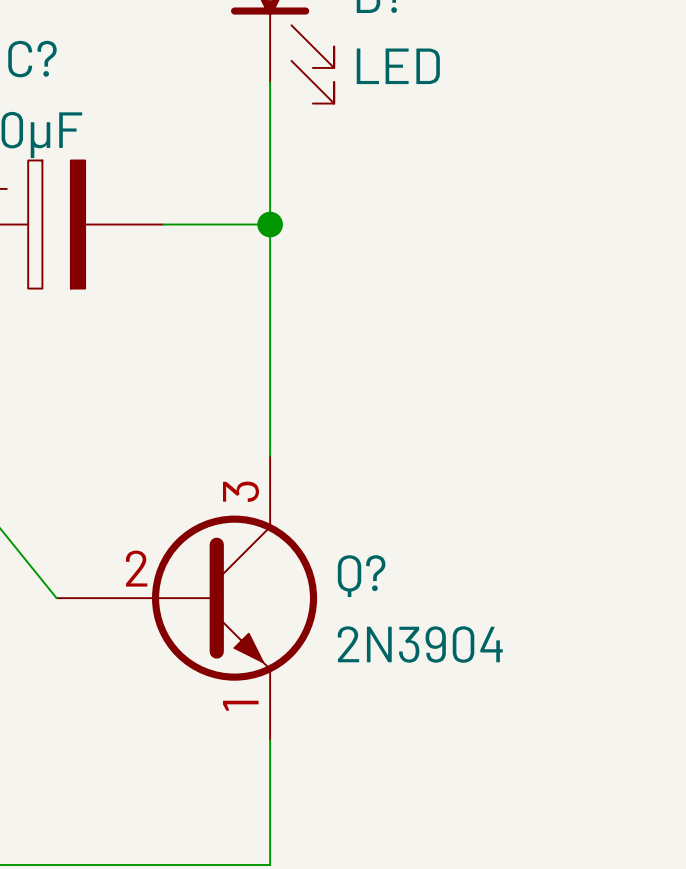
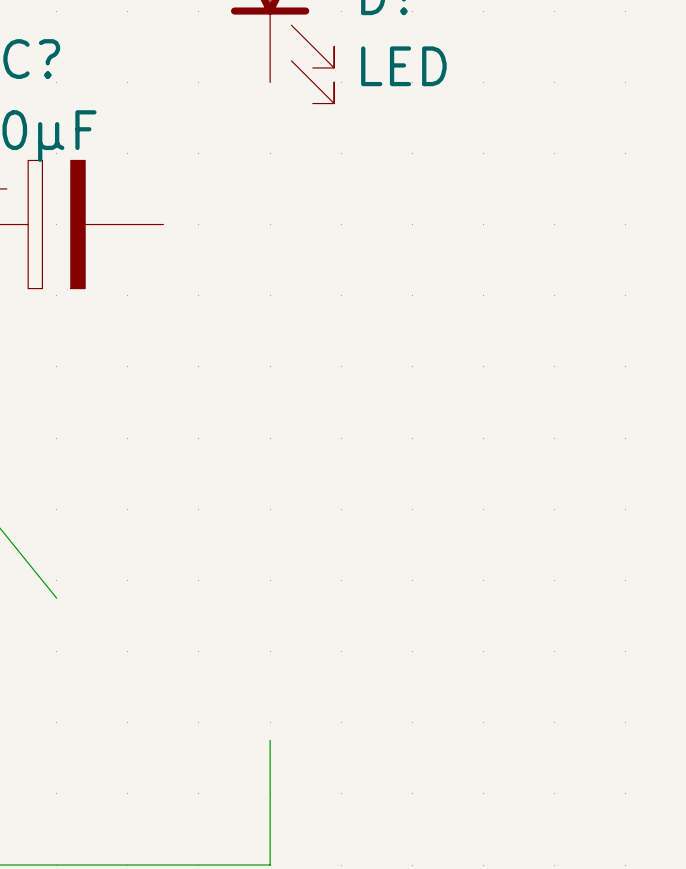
wire: (270, 82) (270, 455) -> none
wire: (163, 224) (270, 224) -> none
junction: (270, 224) -> none
Q?: 2N3904 (186, 598) -> none

